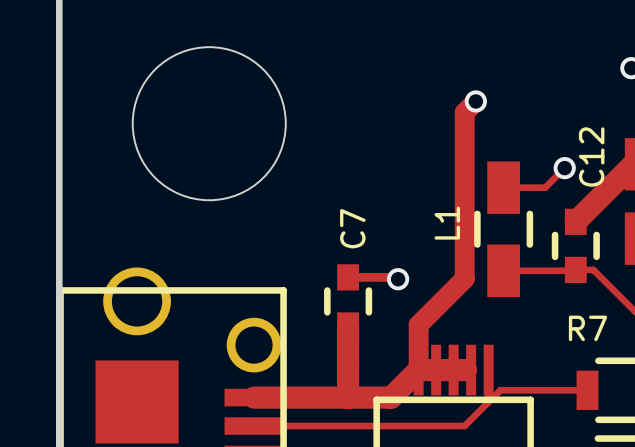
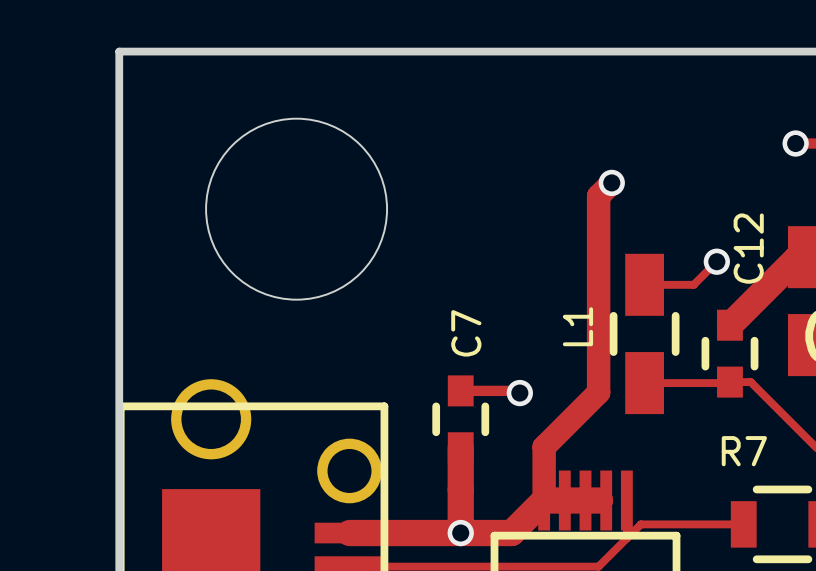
via: none -> (460, 533)

